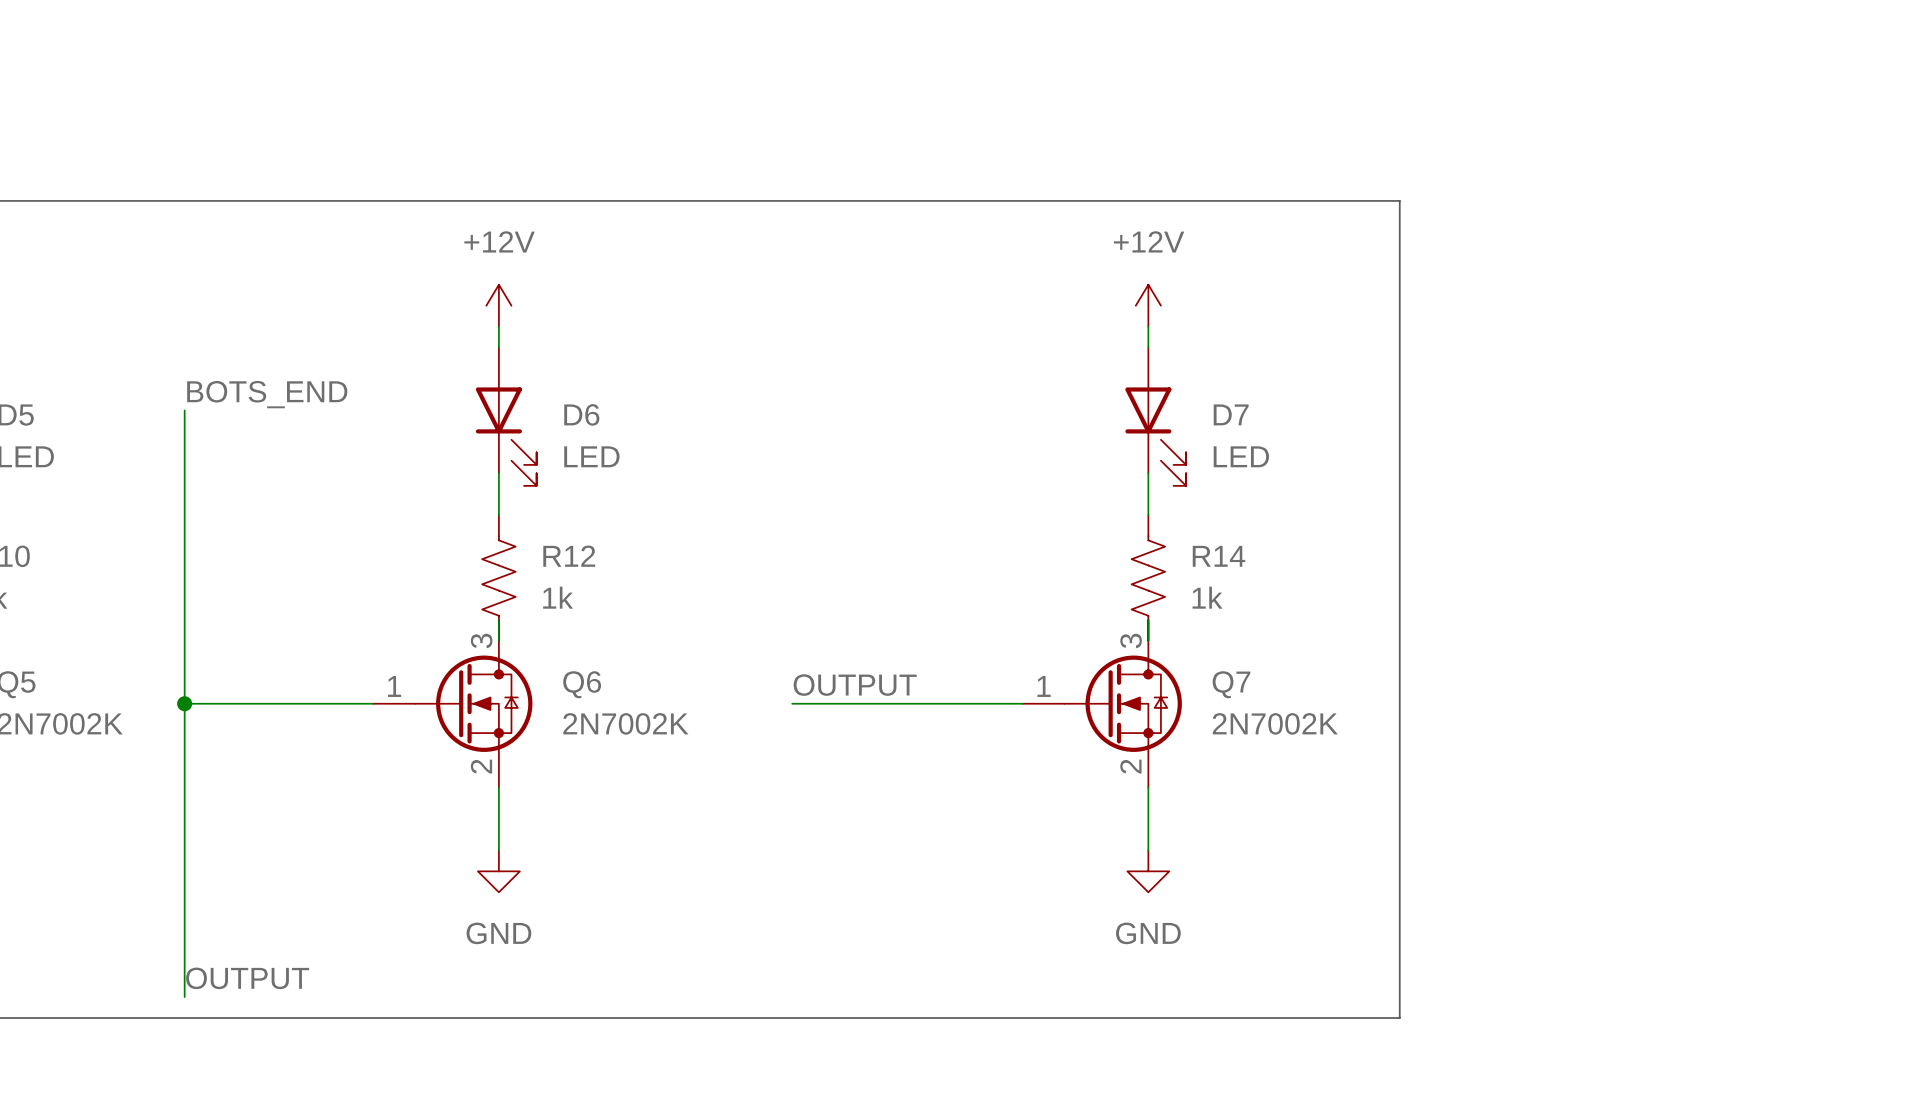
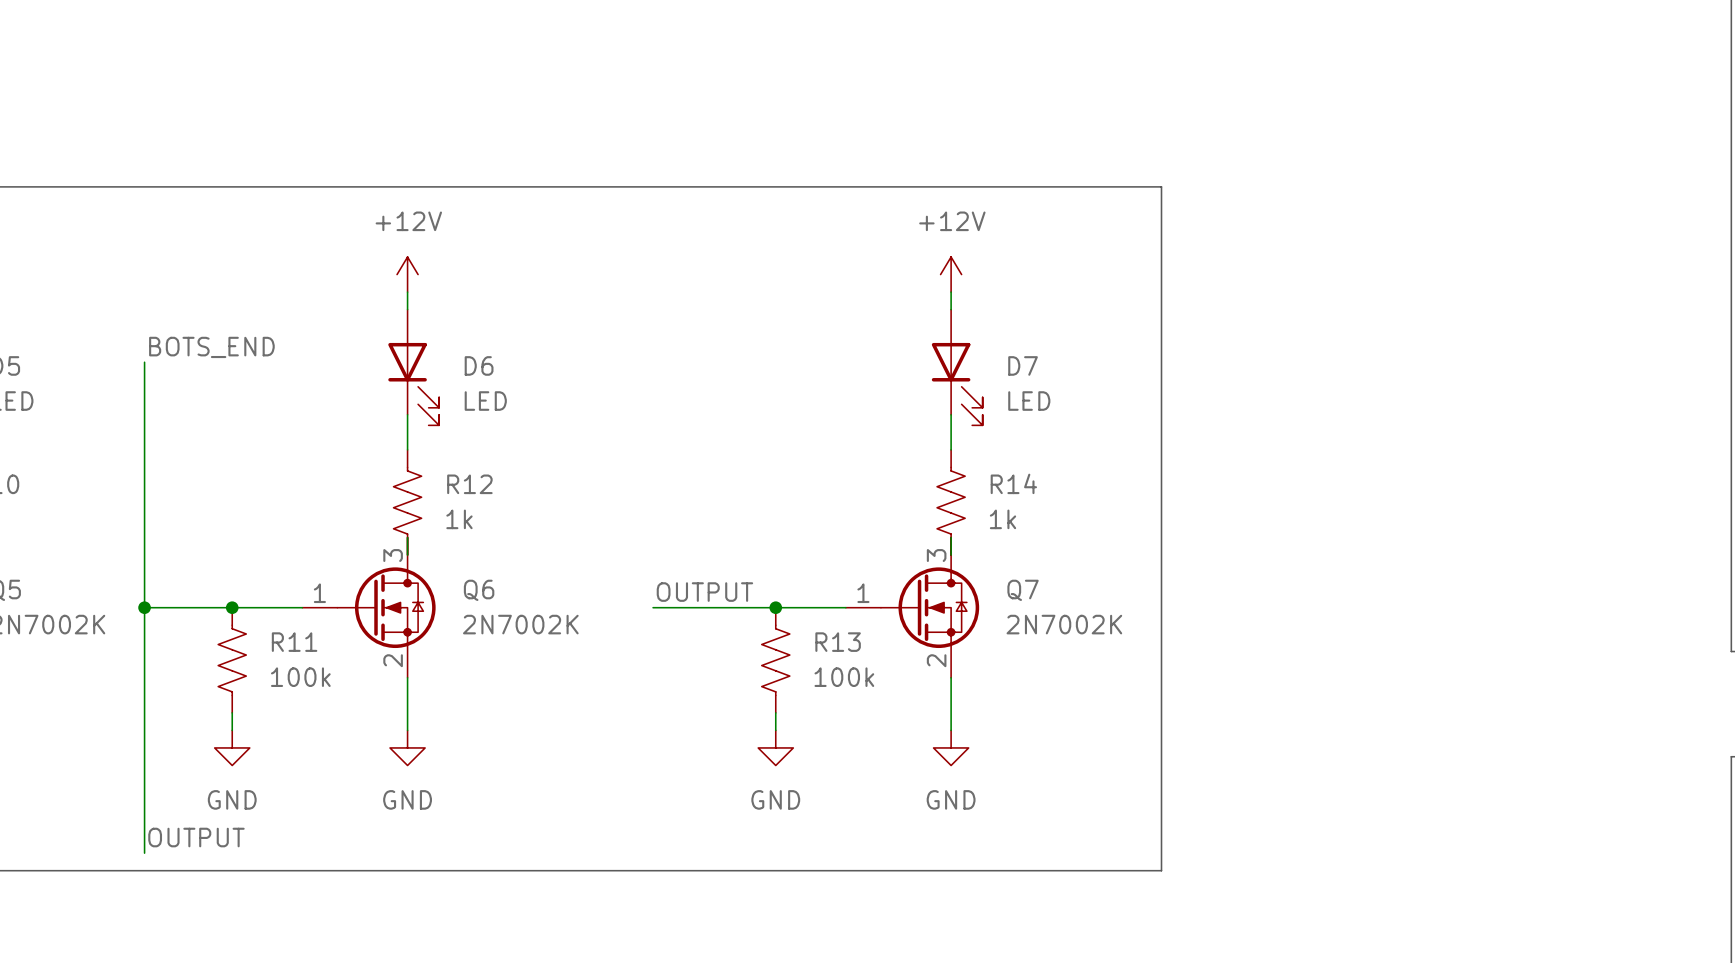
junction: none -> (232, 607)
junction: none -> (775, 607)
R11: none -> 100k (232, 660)
R13: none -> 100k (775, 660)
wire: none -> (232, 712) (232, 730)
wire: none -> (775, 712) (775, 730)
power symbol: none -> GND (232, 747)
power symbol: none -> GND (775, 747)

